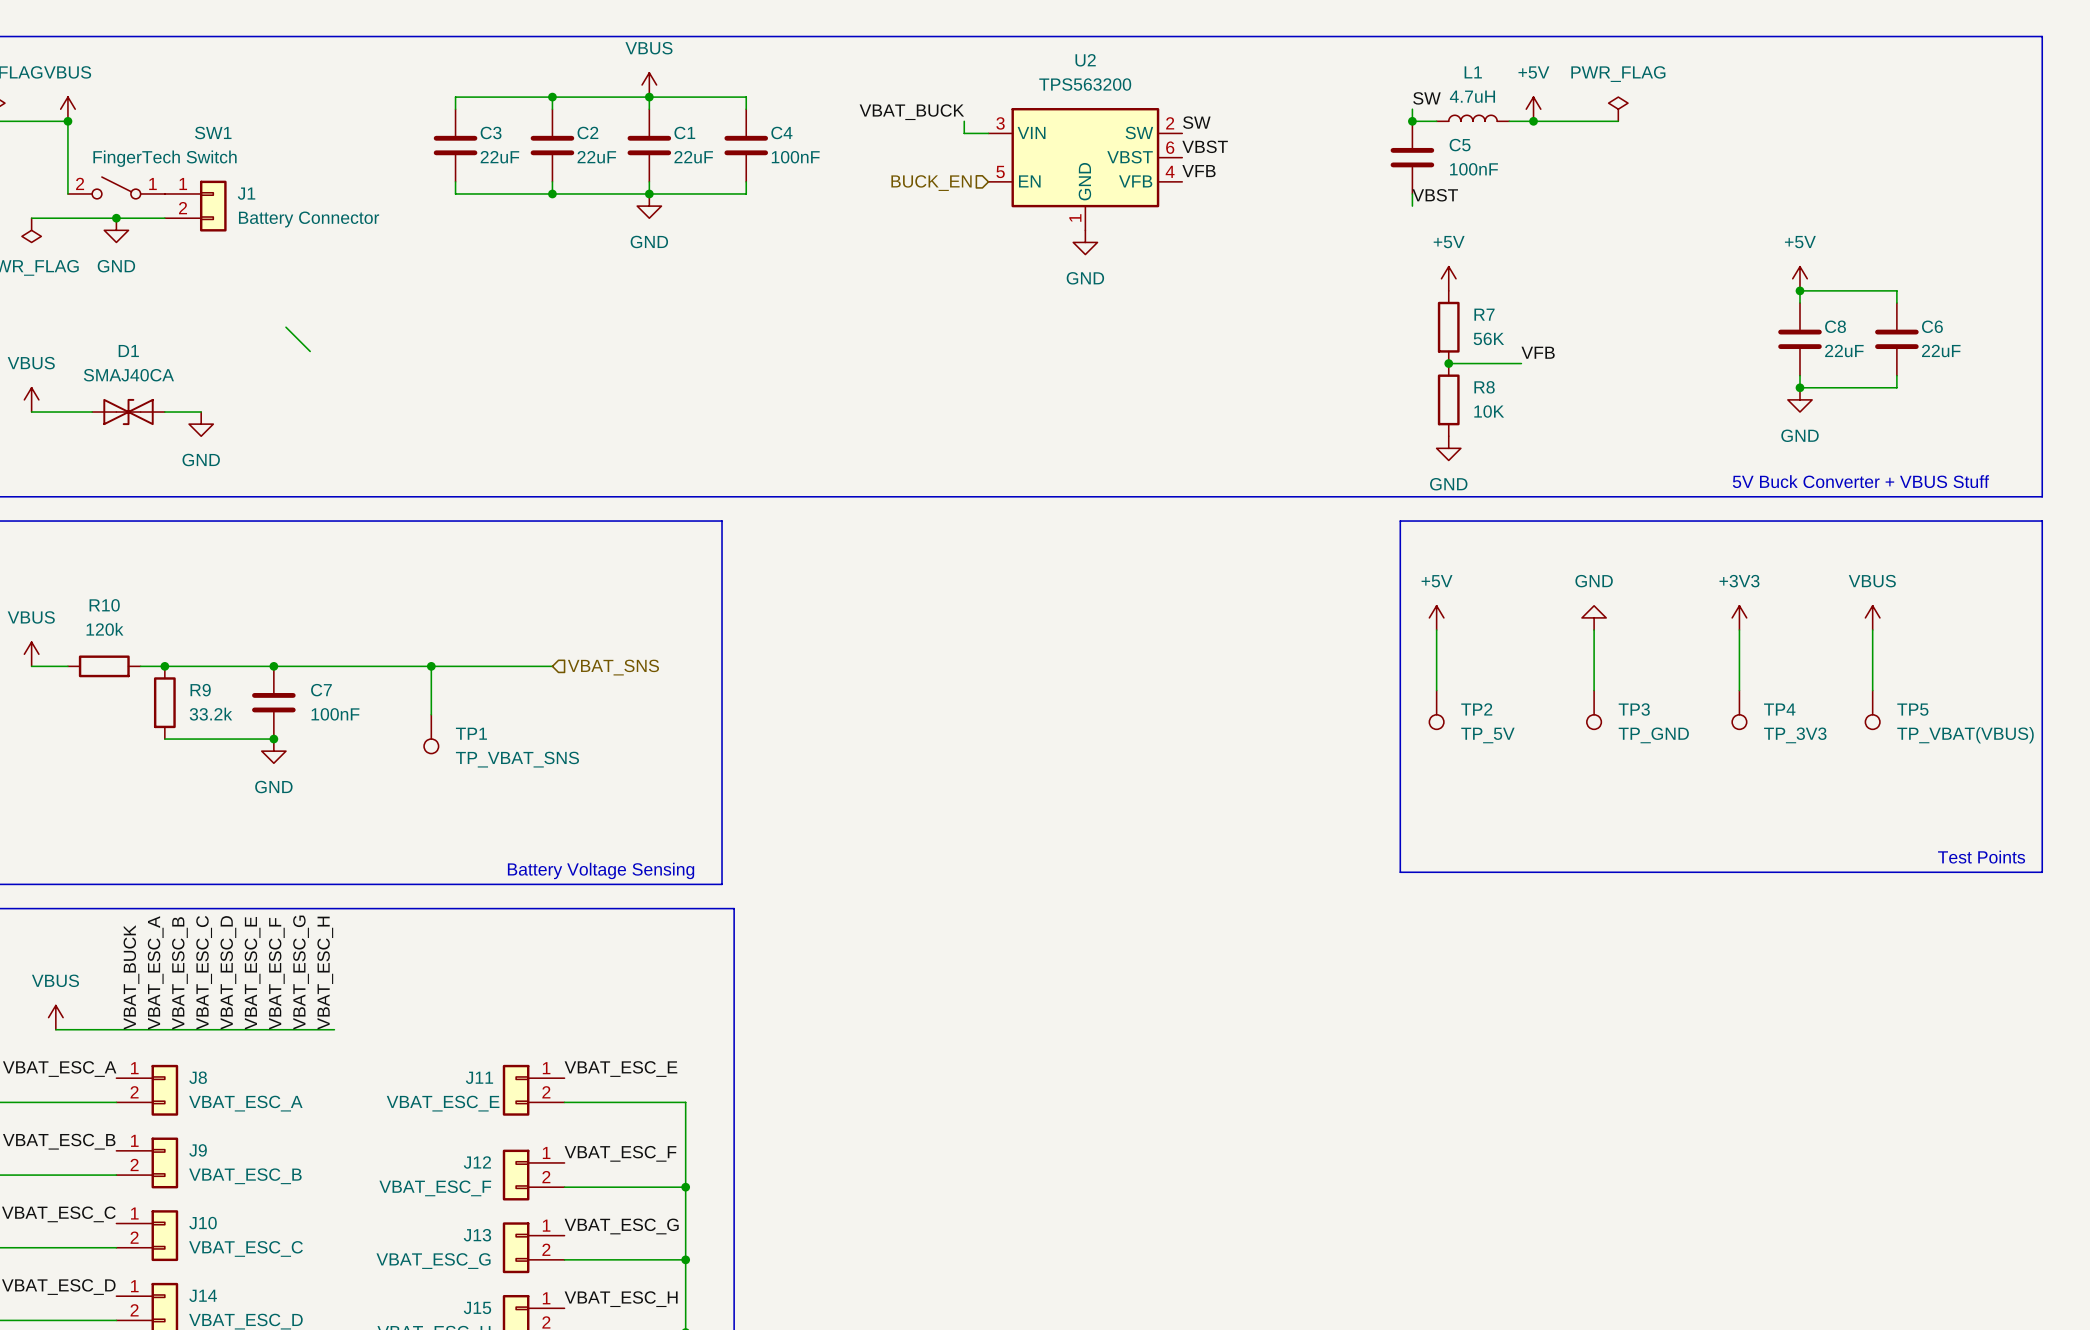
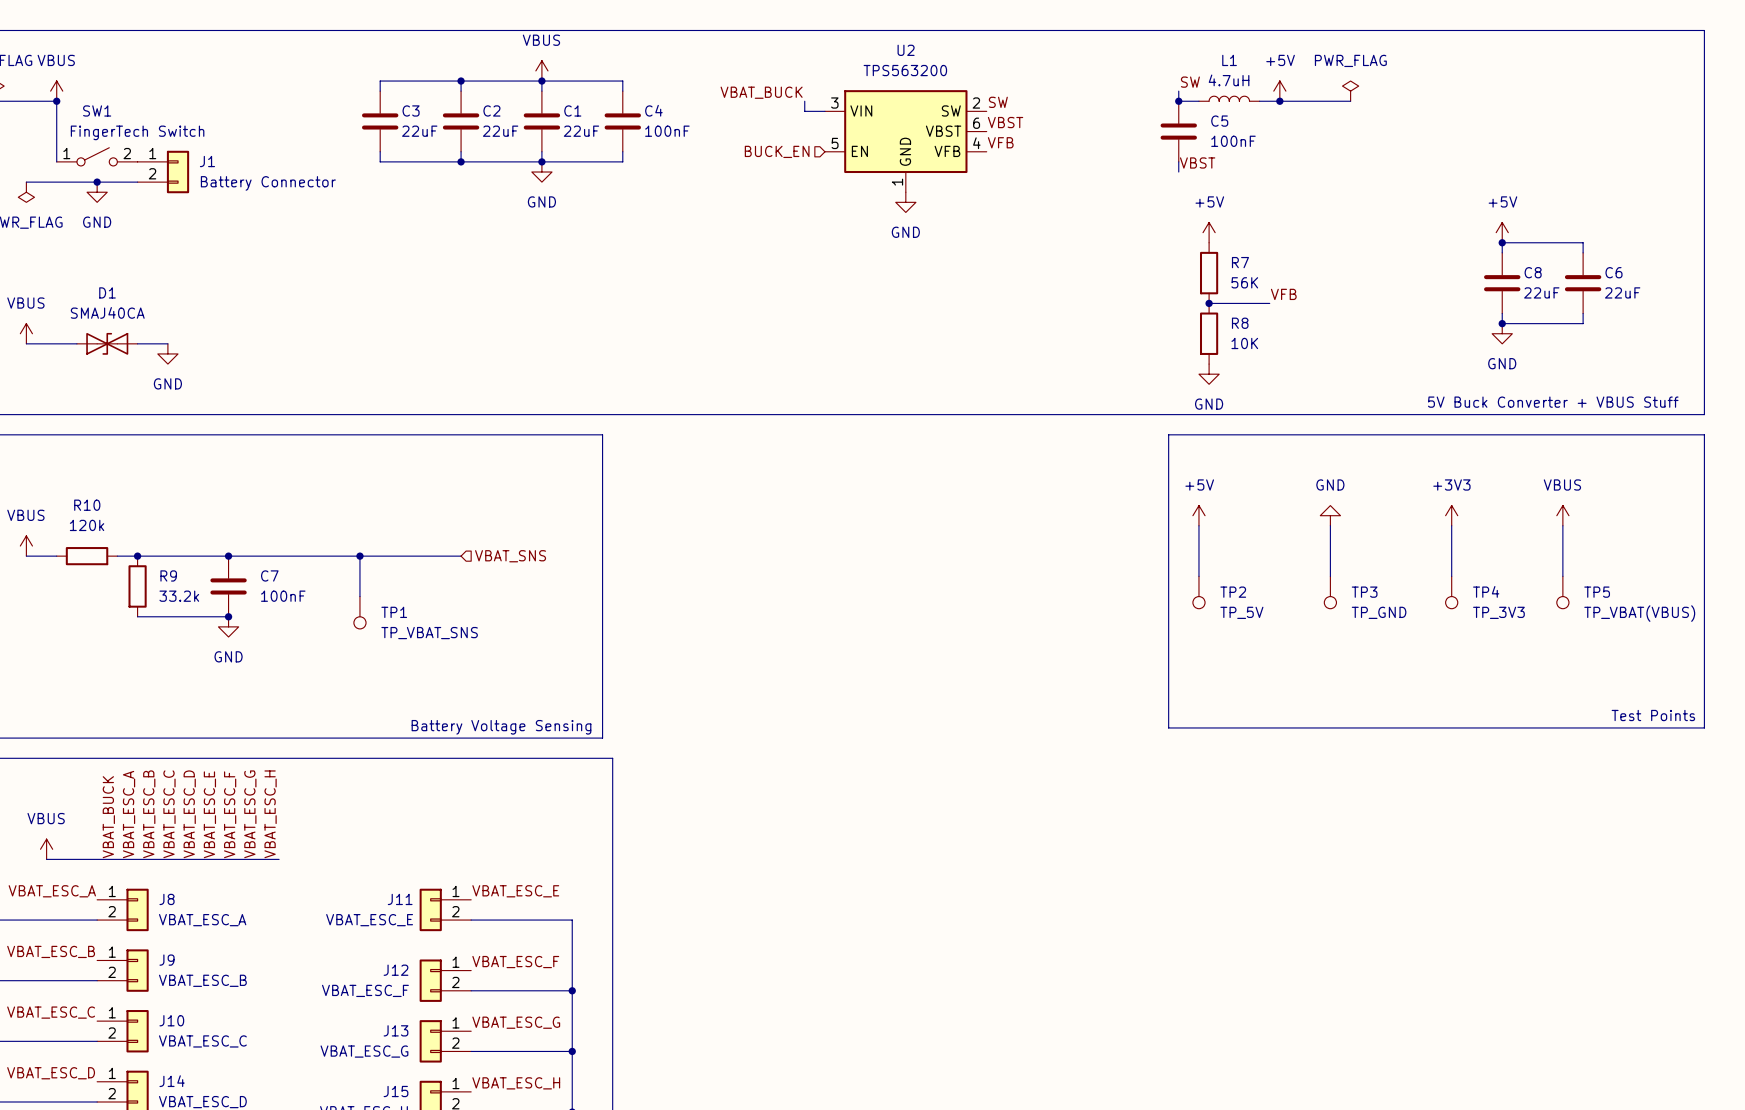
SW1 name position: SW1 (213, 132) -> SW1 (97, 110)
SW1 flip: as is (116, 187) -> left-right (97, 156)
wire: (285, 327) (310, 351) -> none

